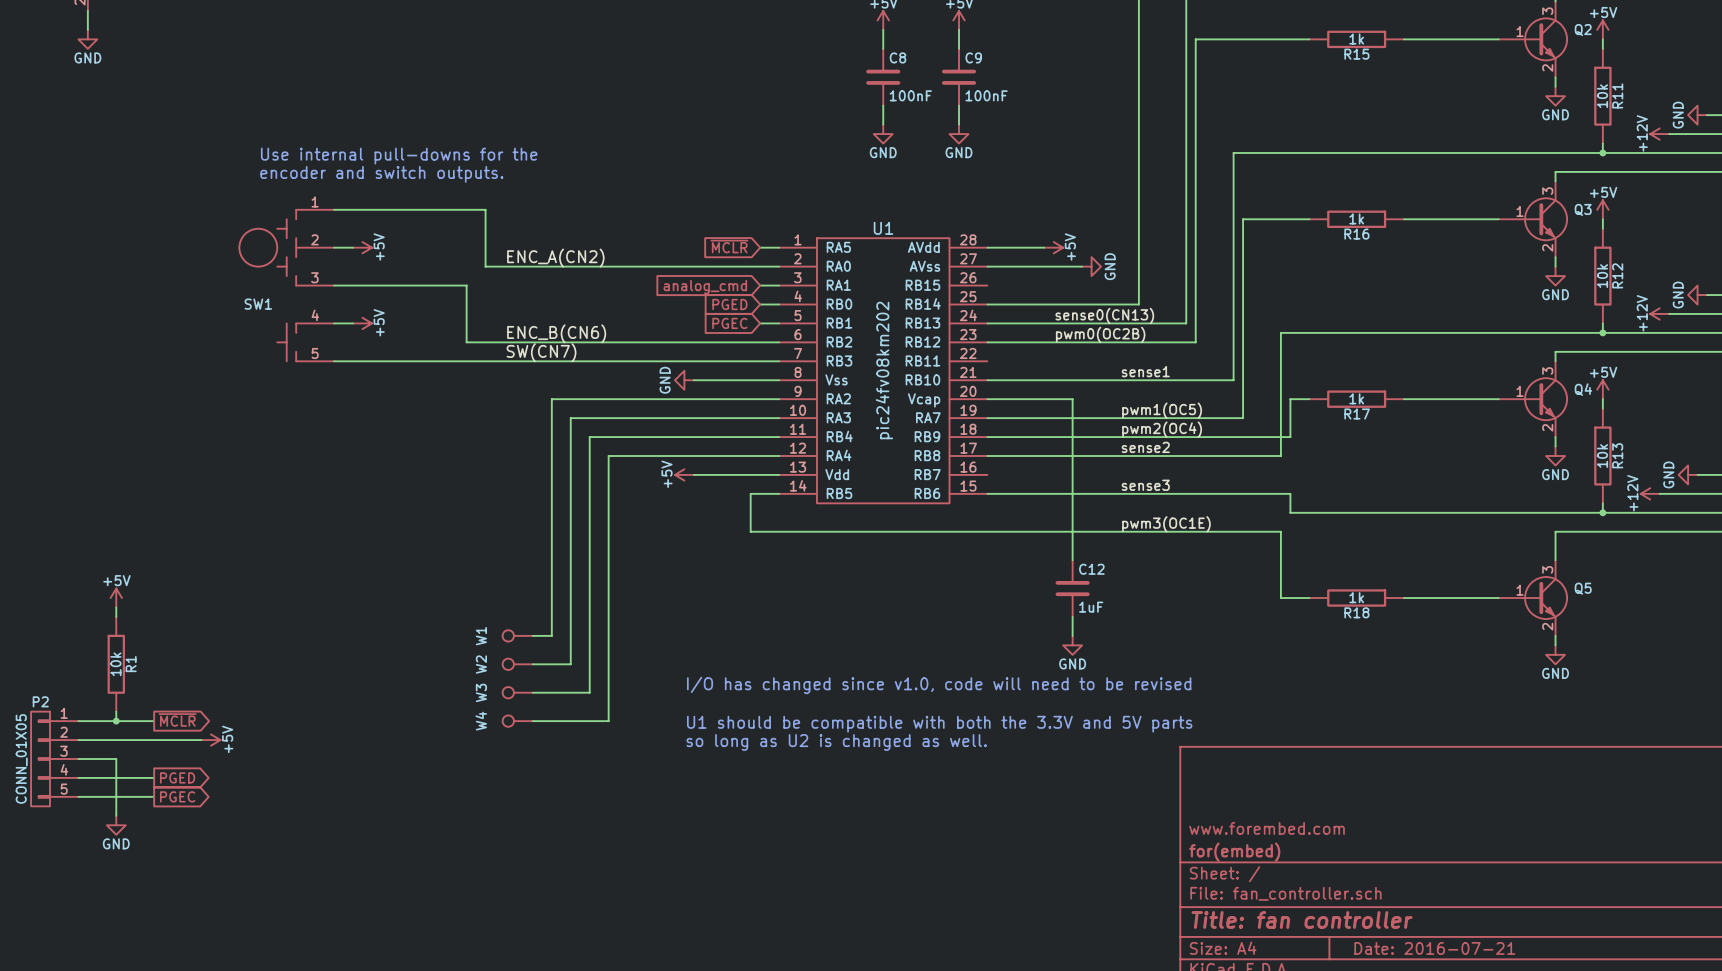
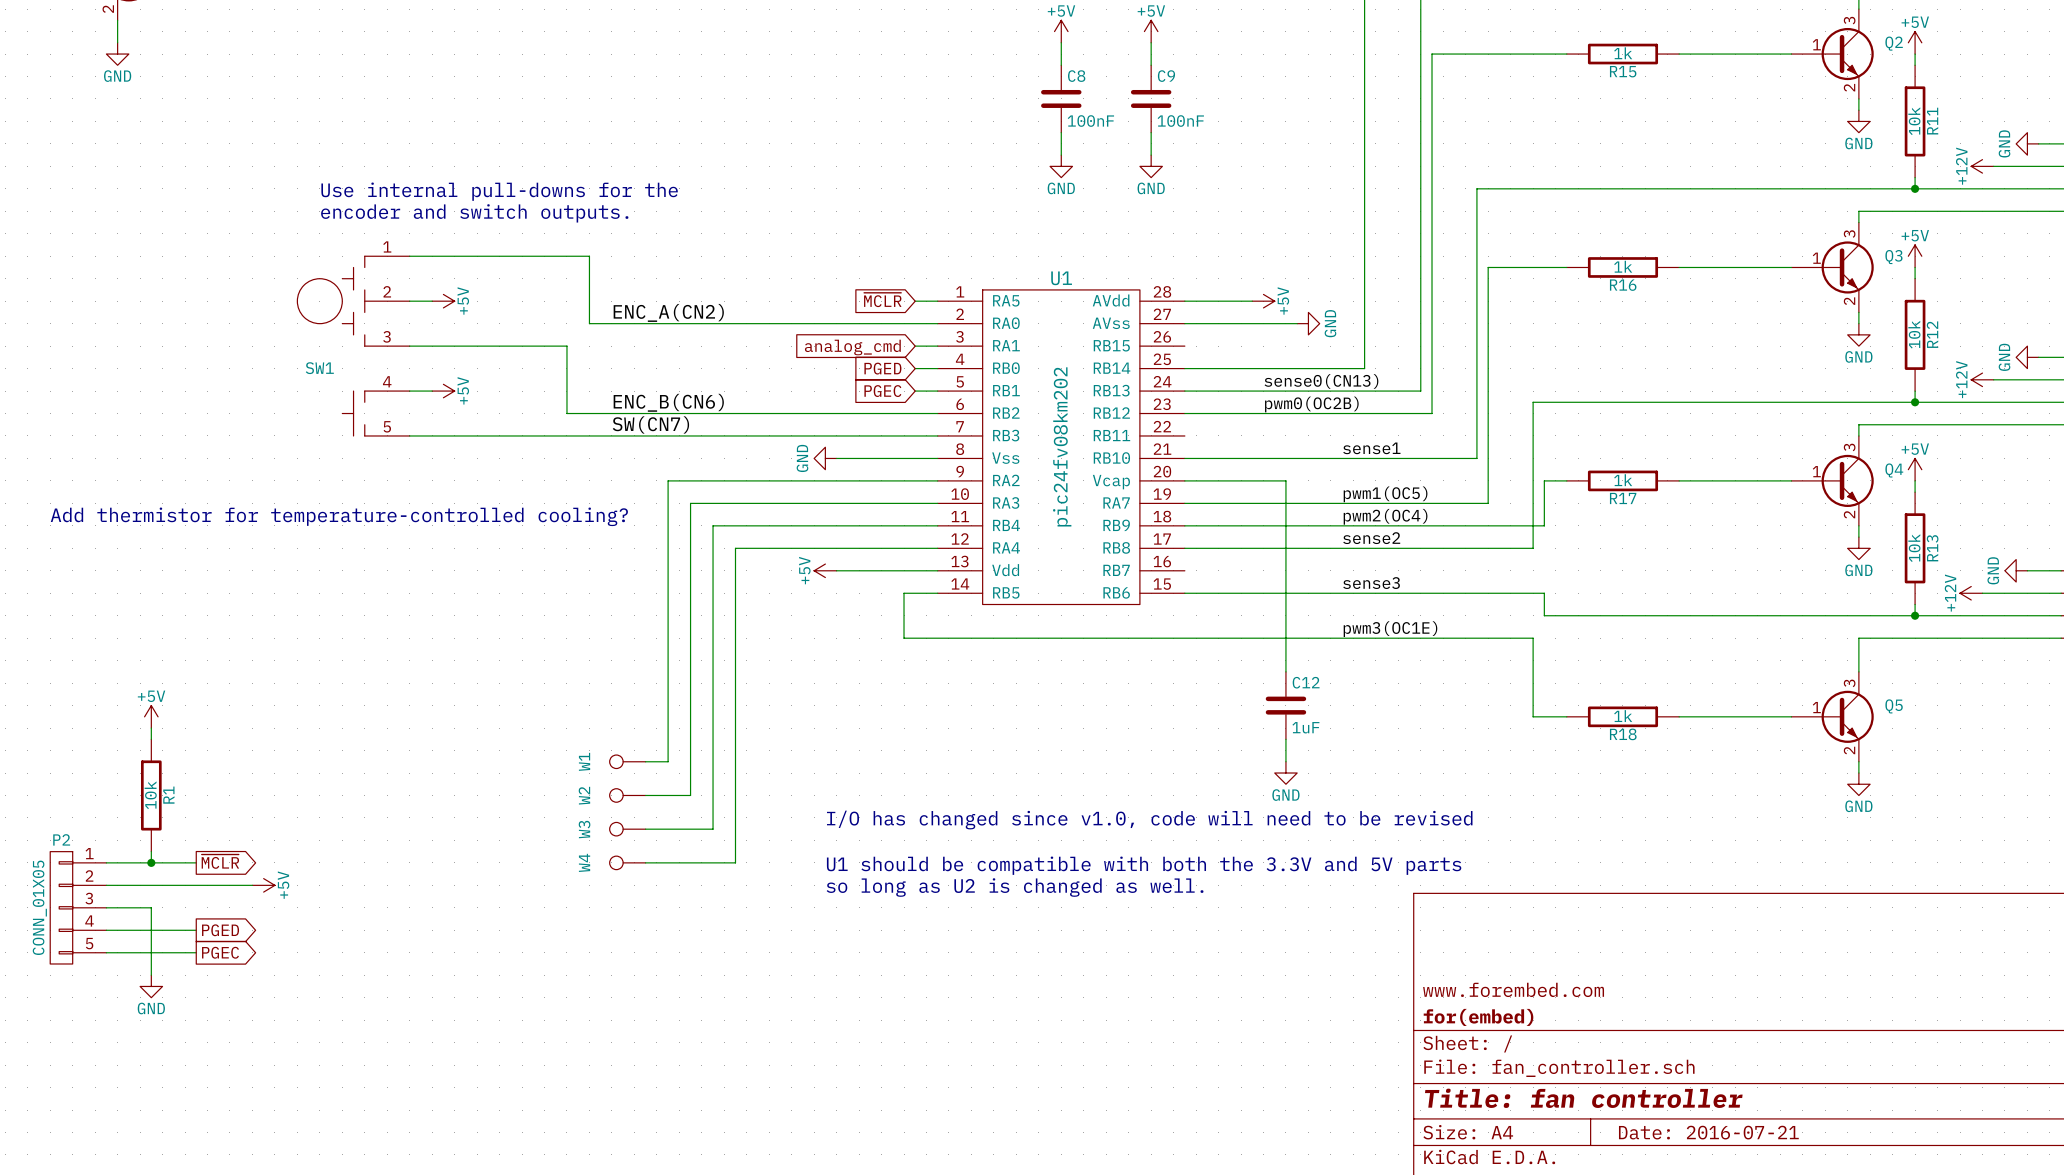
text: none -> Add thermistor for temperature-controlled cooling? (339, 516)

